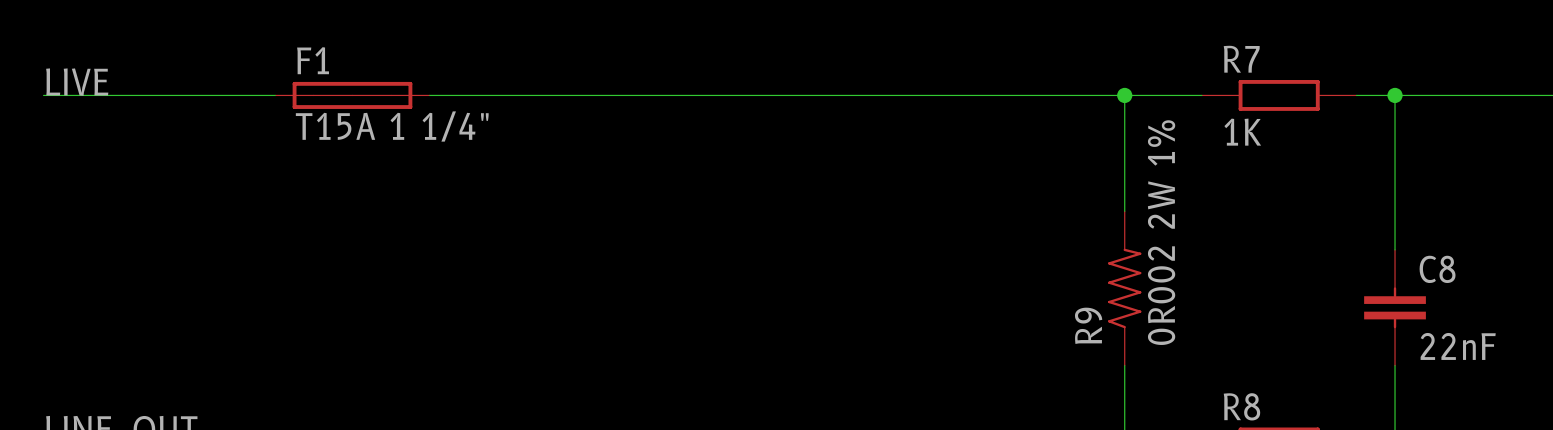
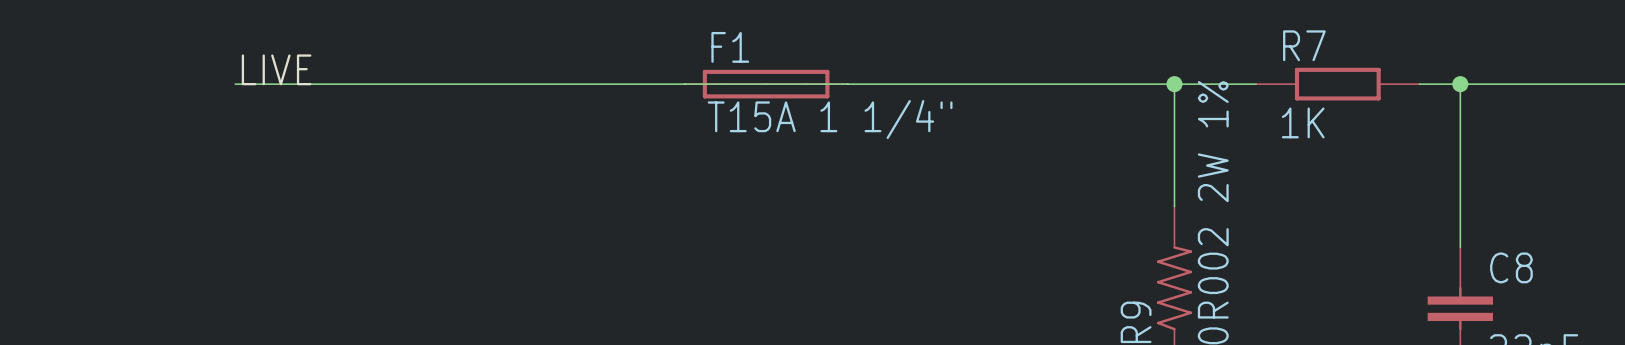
label position: LIVE (77, 82) -> LIVE (276, 69)
wire: (43, 95) (236, 95) -> none
F1 position: (352, 95) -> (766, 84)

